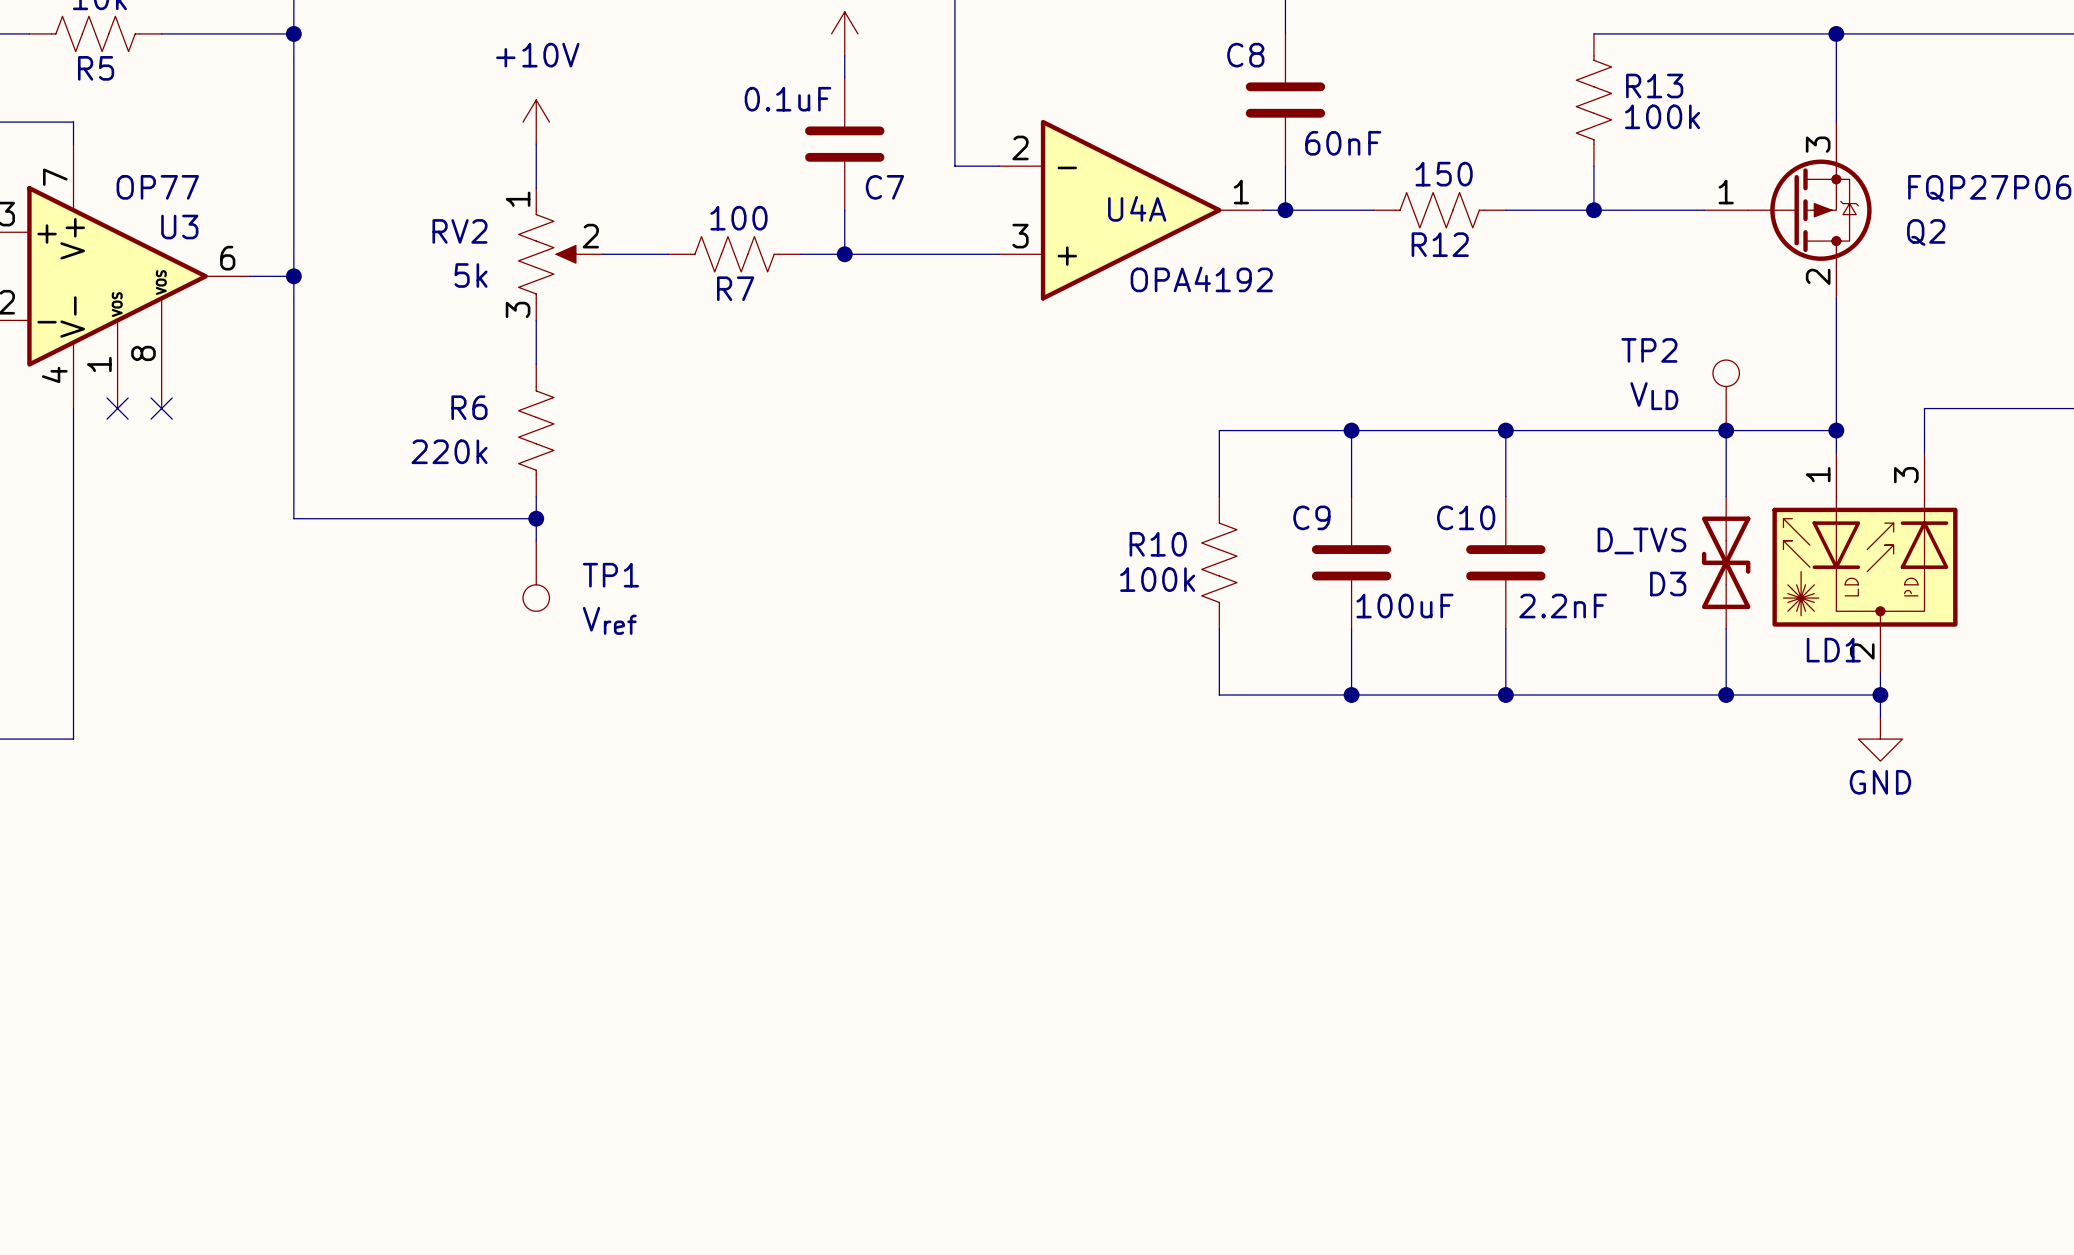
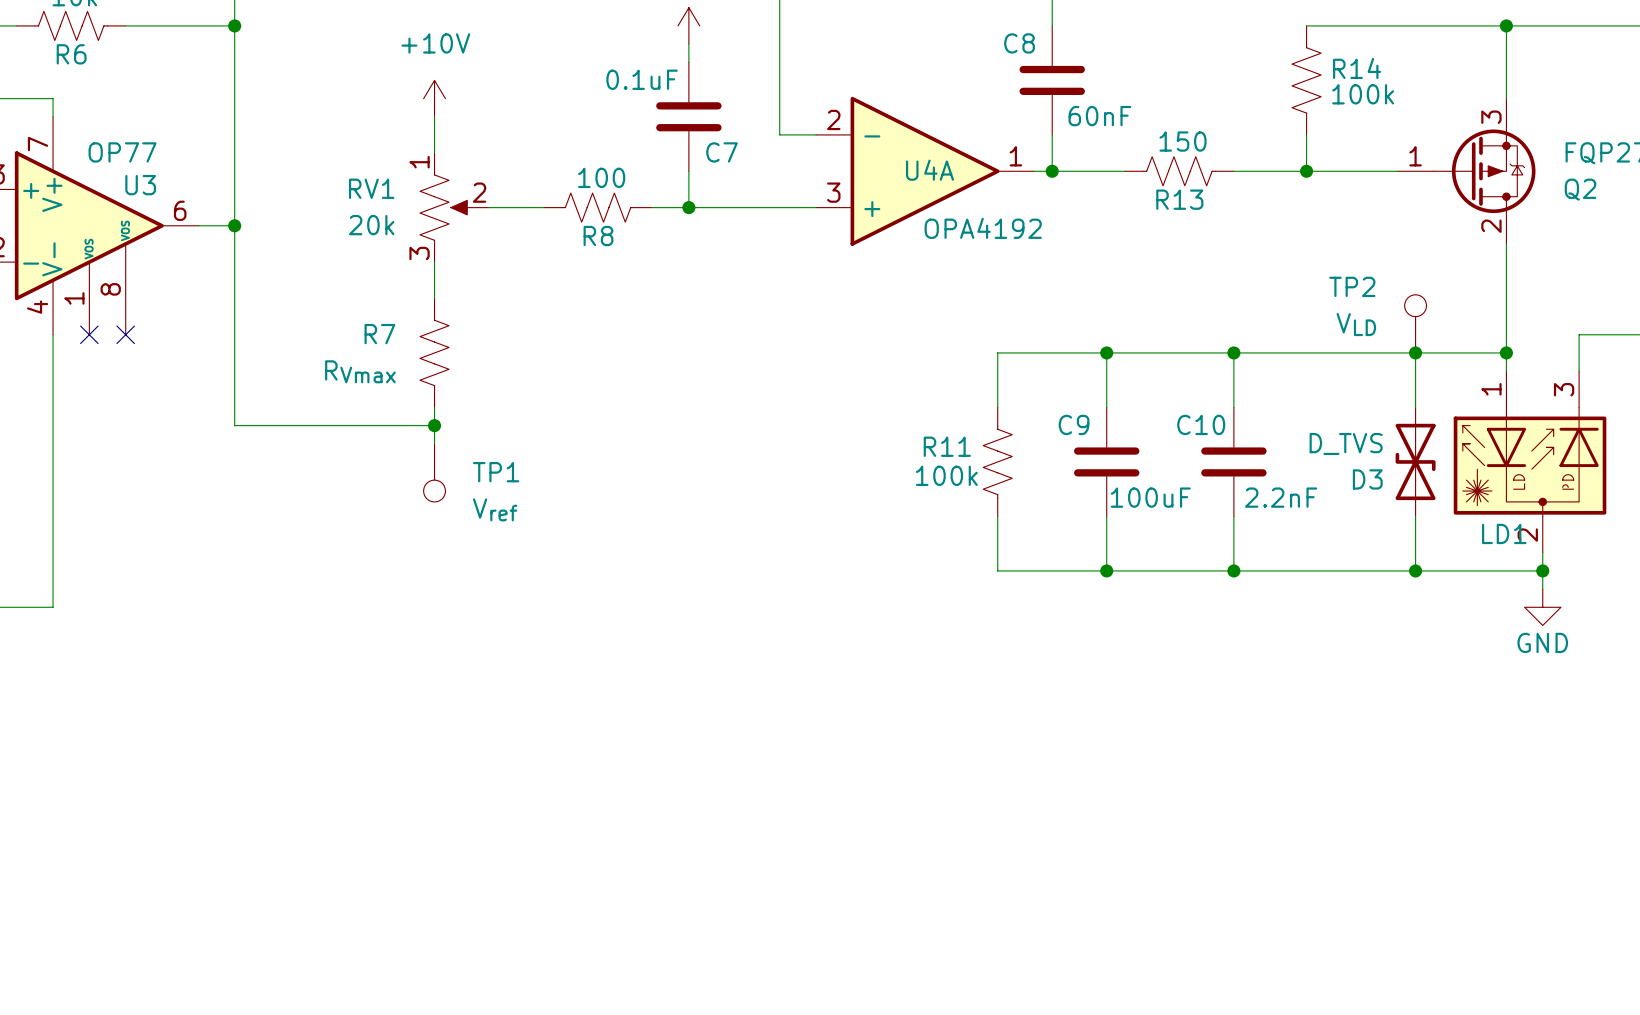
R5 name: R5 (96, 68) -> R6 (71, 54)
R13 name: R13 (1654, 85) -> R14 (1357, 68)
RV2 name: RV2 (460, 231) -> RV1 (371, 188)
R12 name: R12 (1440, 244) -> R13 (1179, 199)
RV2 value: 5k (471, 275) -> 20k (371, 225)
R7 name: R7 (735, 288) -> R8 (598, 236)
R6 name: R6 (469, 407) -> R7 (379, 334)
R6 value: 220k (449, 451) -> RVmax (360, 371)
R10 name: R10 (1158, 544) -> R11 (947, 446)

